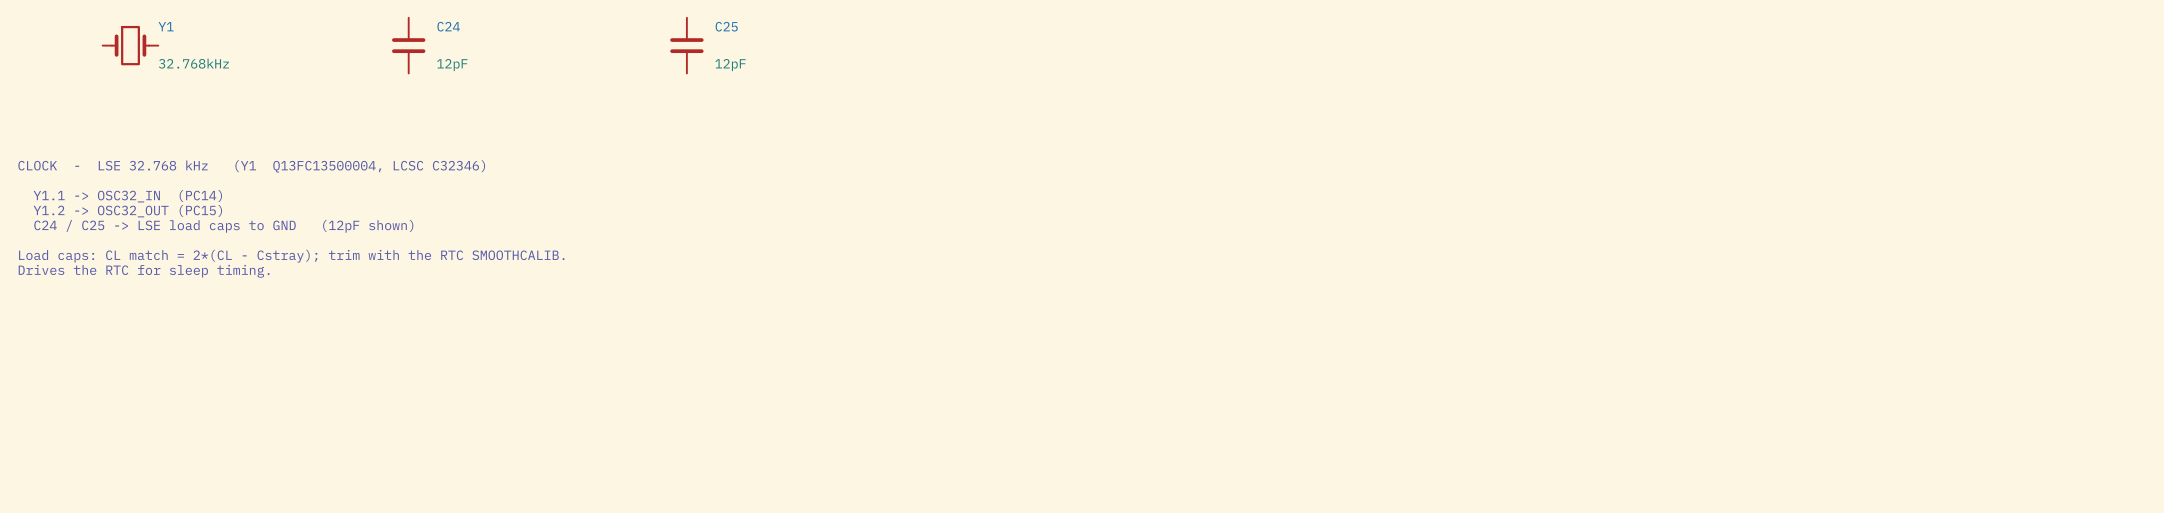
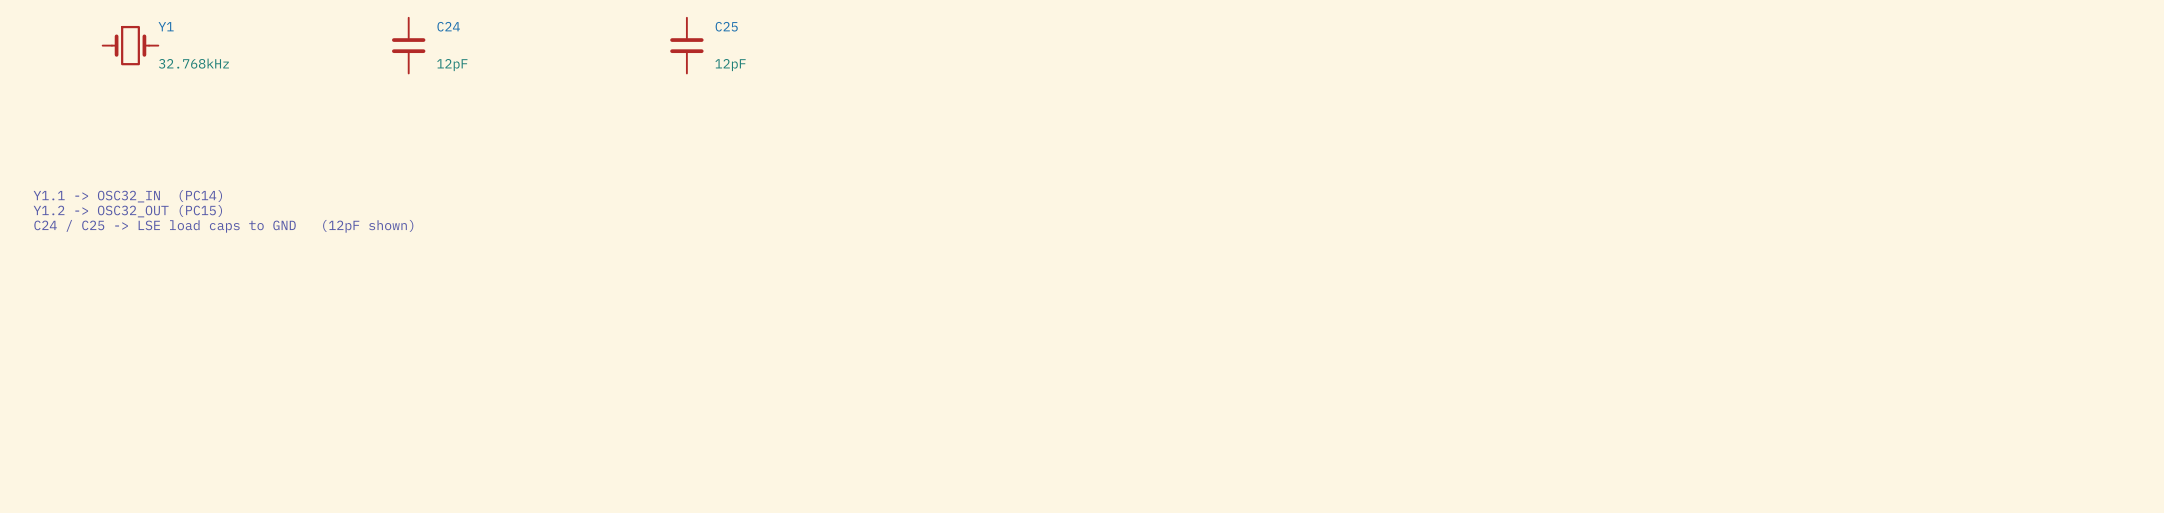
text: CLOCK - LSE 32.768 kHz (Y1 Q13FC13500004, LCSC C32346) (251, 166) -> none
text: Load caps: CL match = 2*(CL - Cstray); trim with the RTC SMOOTHCALIB. (291, 256) -> none
text: Drives the RTC for sleep timing. (144, 271) -> none

